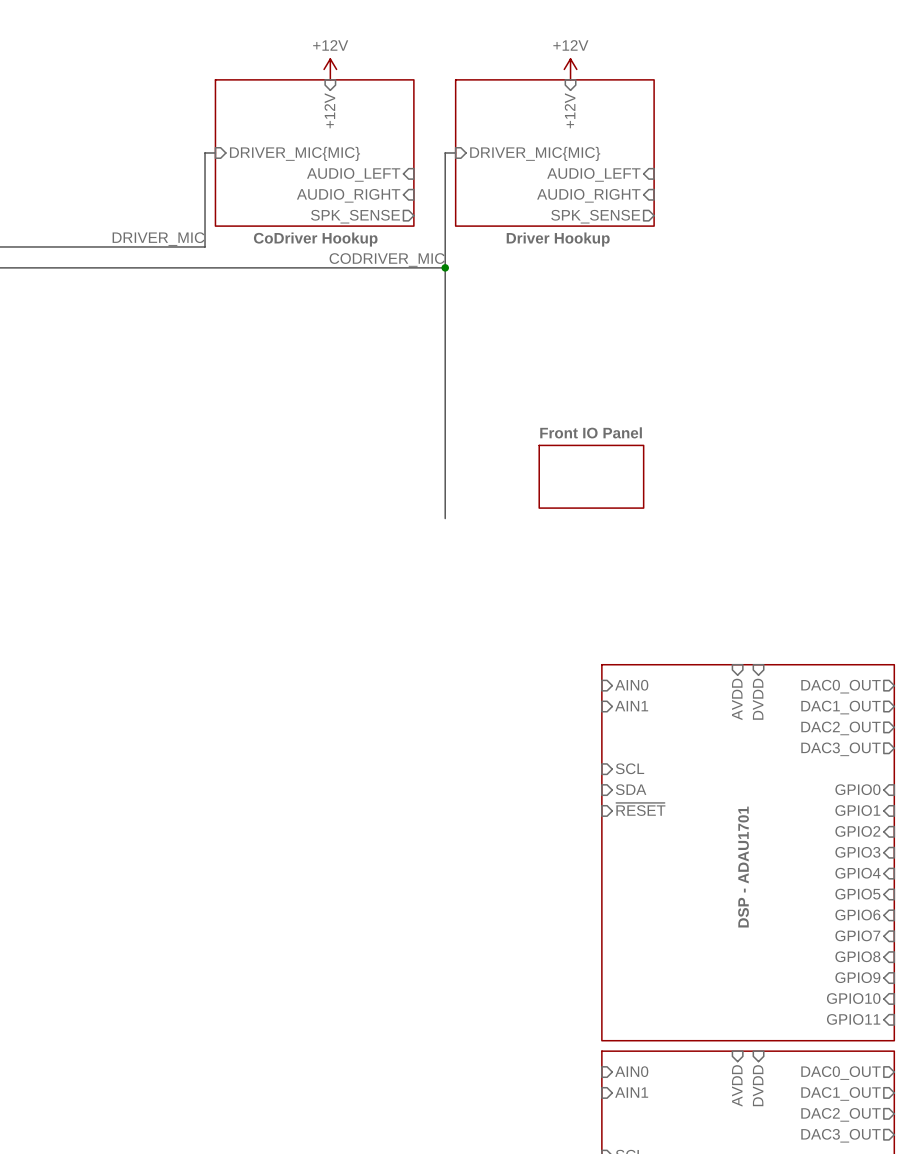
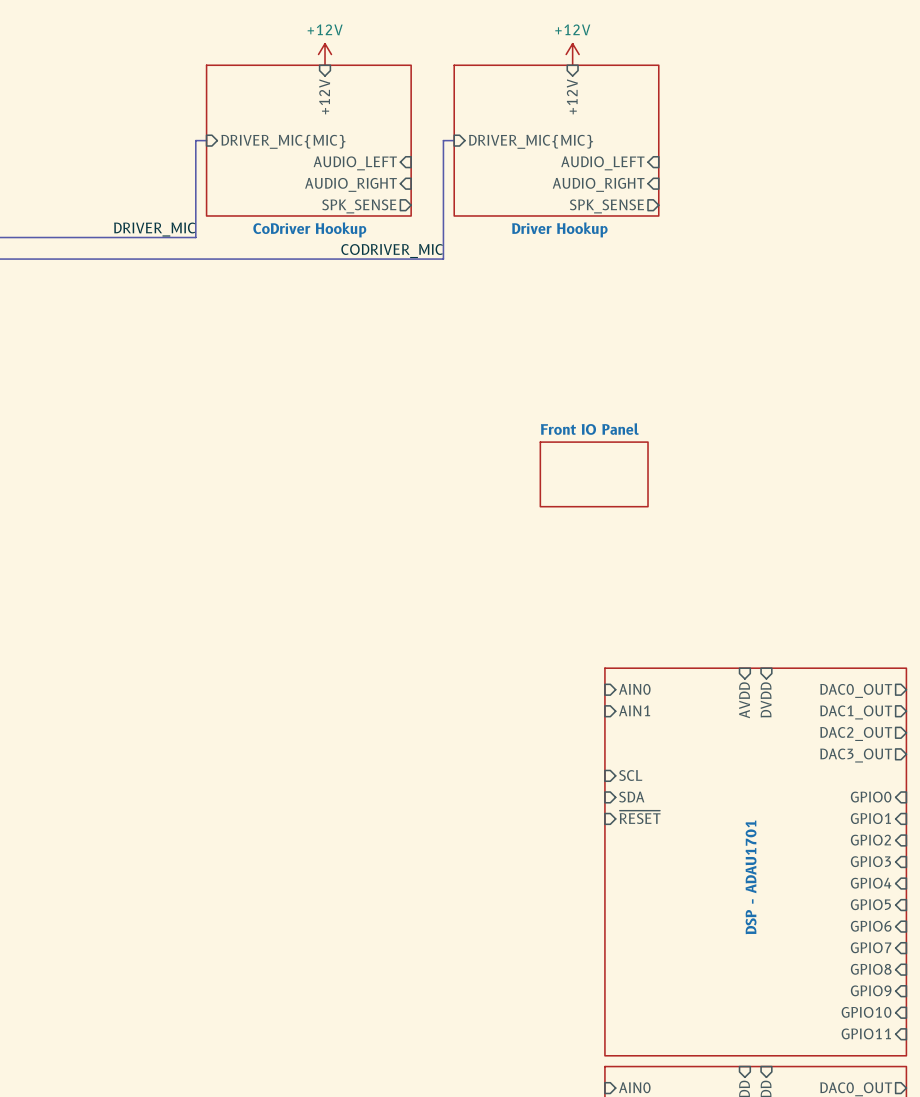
bus: (445, 267) (445, 518) -> none
junction: (445, 267) -> none

